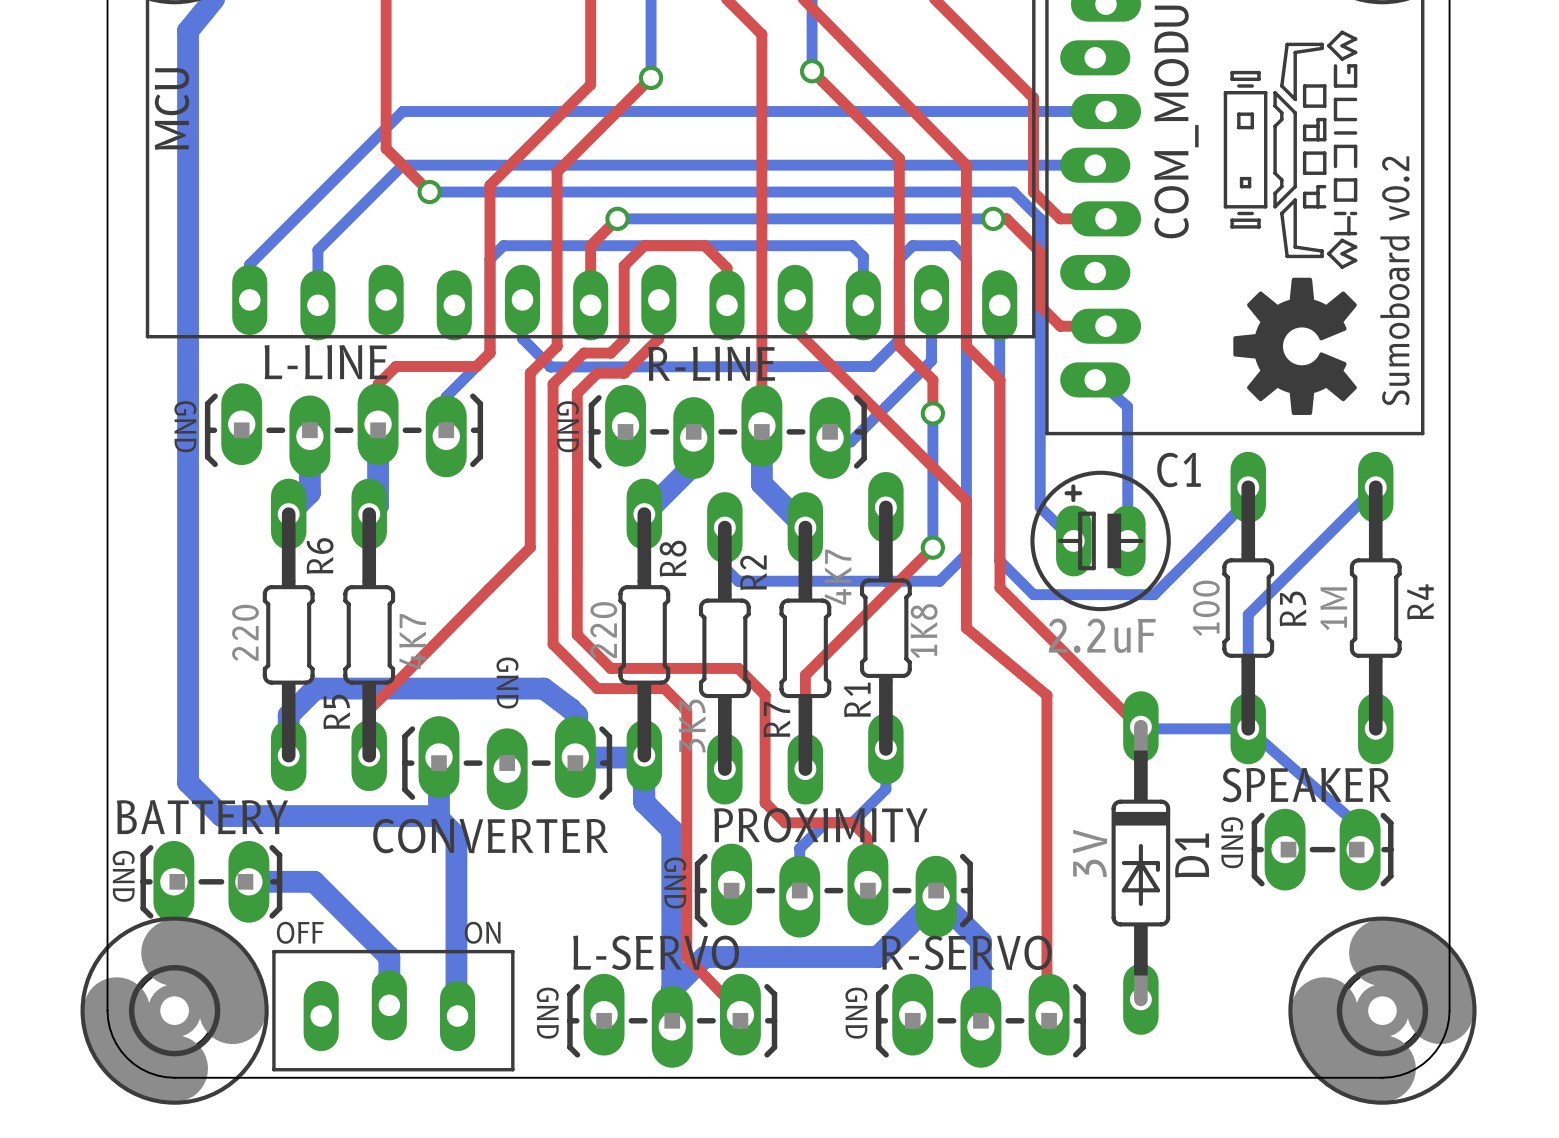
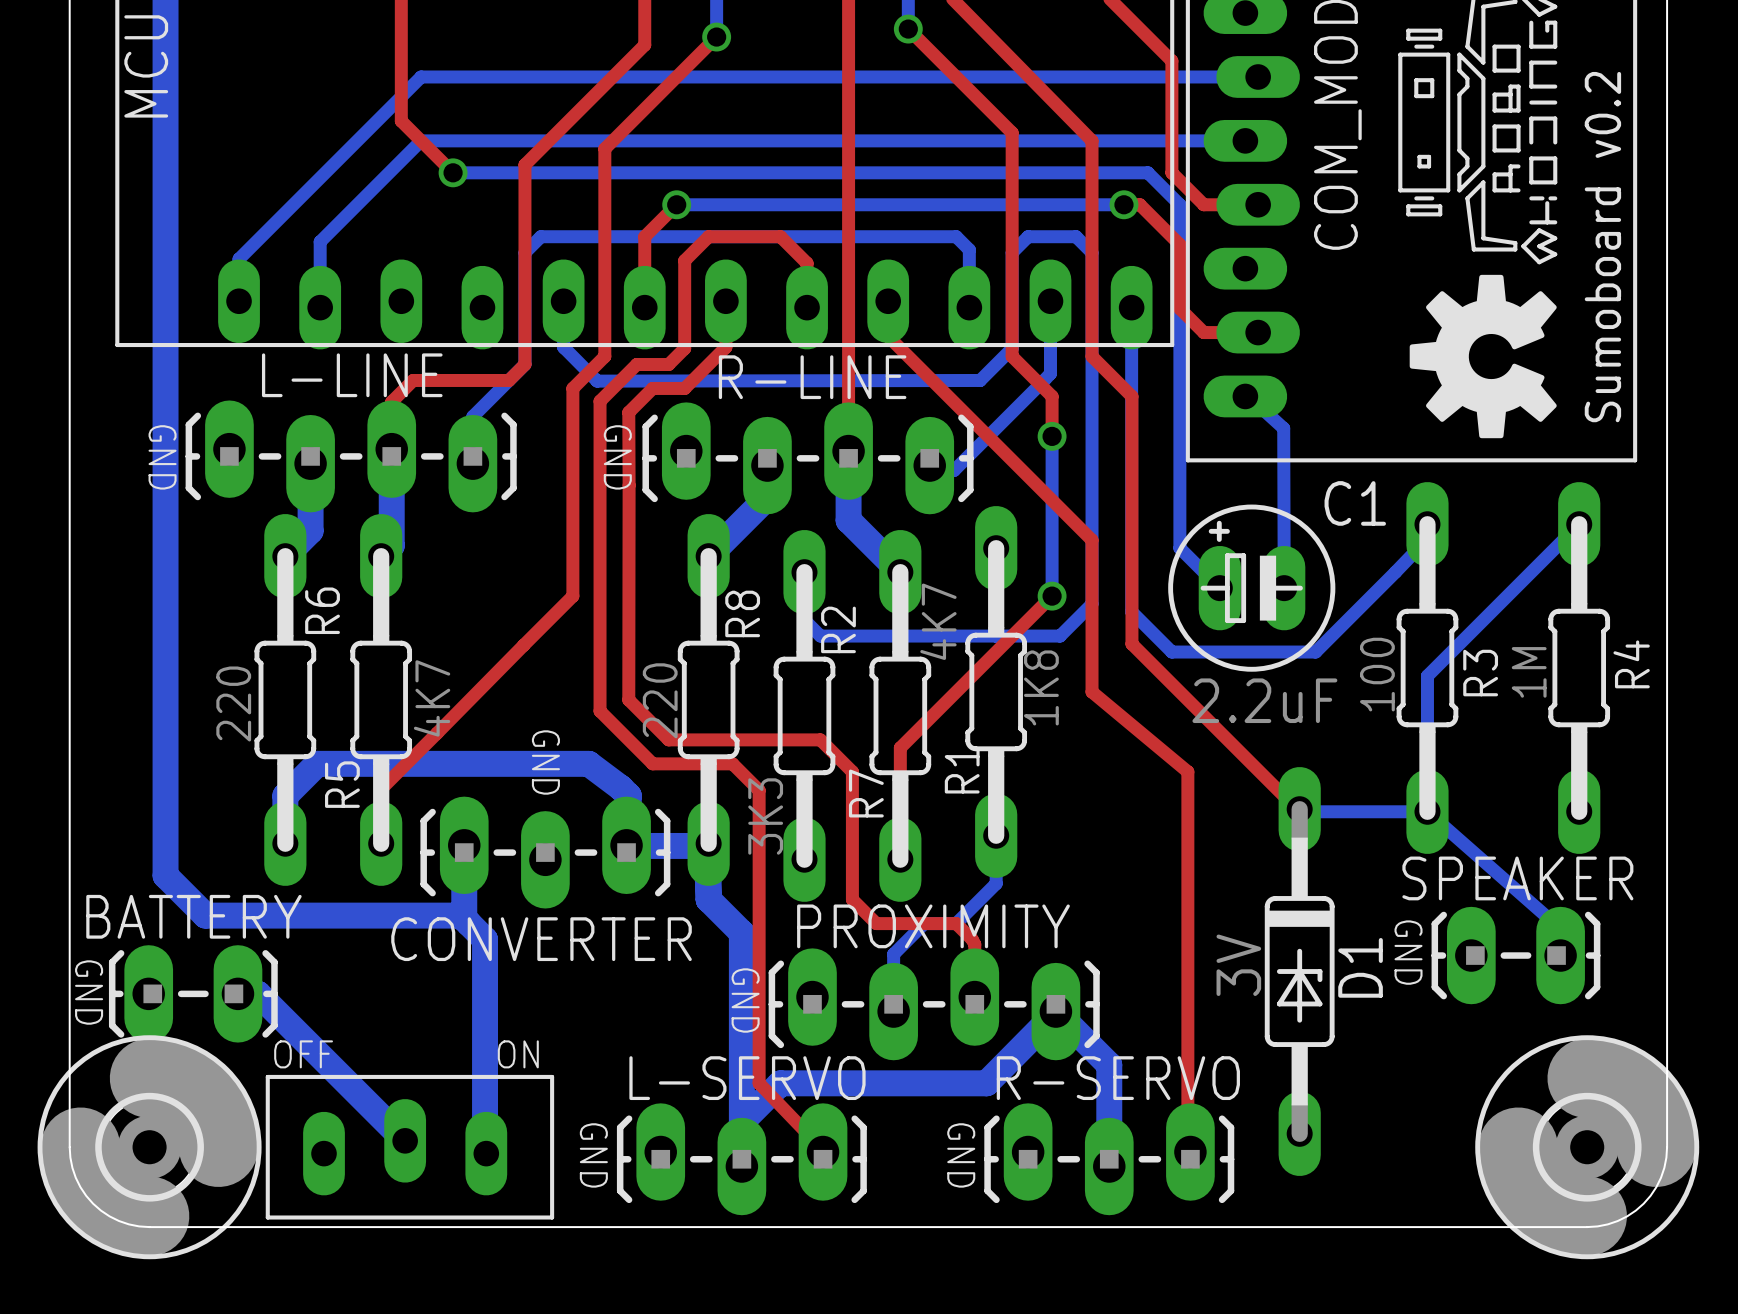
bottom track: (265, 881) (314, 881) (389, 956) (389, 1005) -> (258, 993) (405, 1140)

